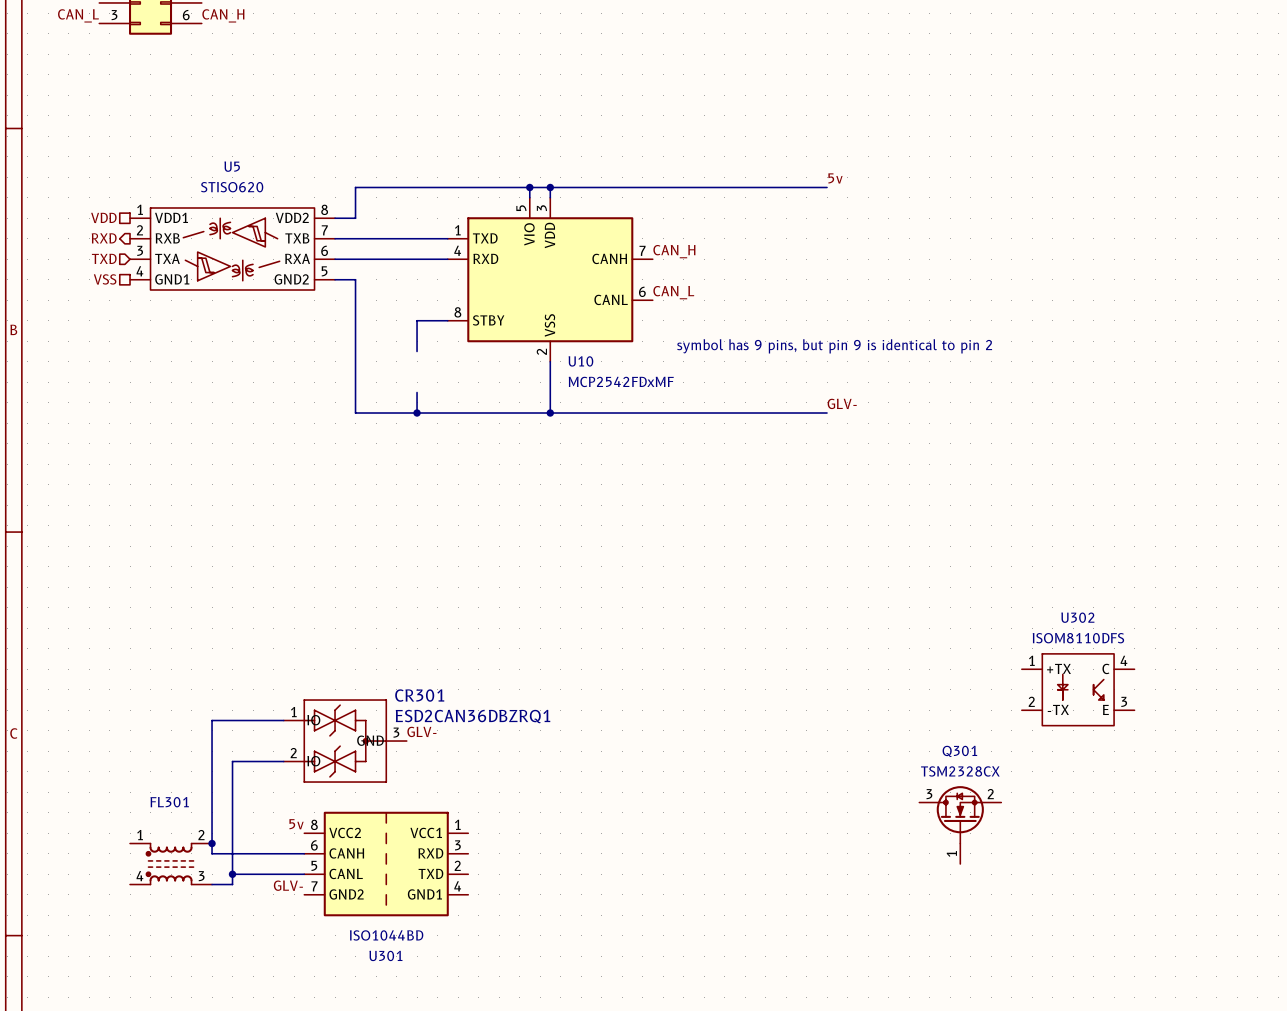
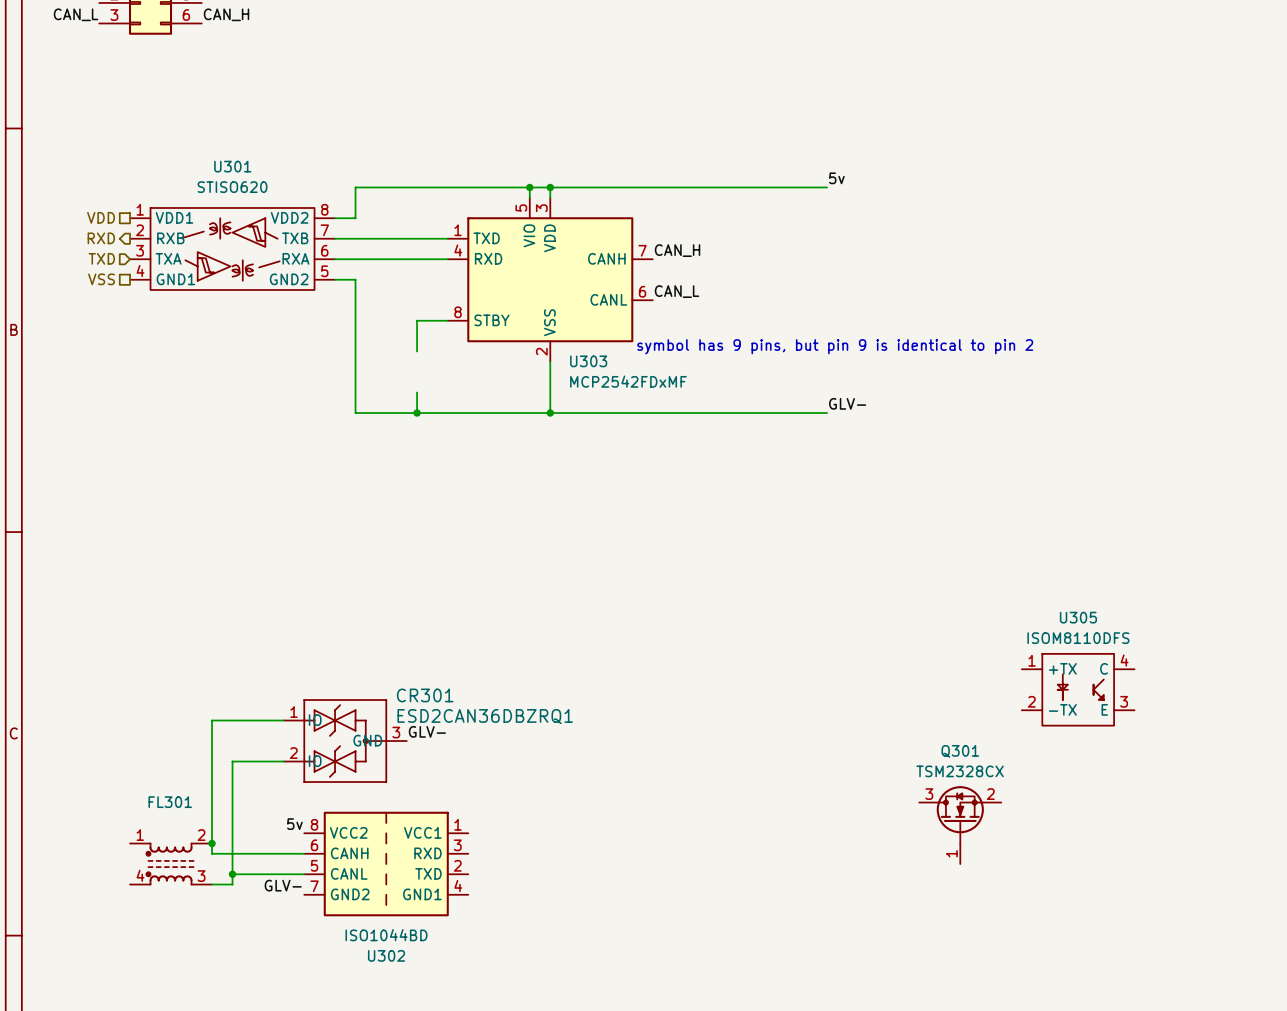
U5 name: U5 (232, 166) -> U301 (232, 166)
U10 name: U10 (580, 361) -> U303 (588, 361)
U302 name: U302 (1077, 617) -> U305 (1078, 617)
U301 name: U301 (385, 955) -> U302 (386, 955)

